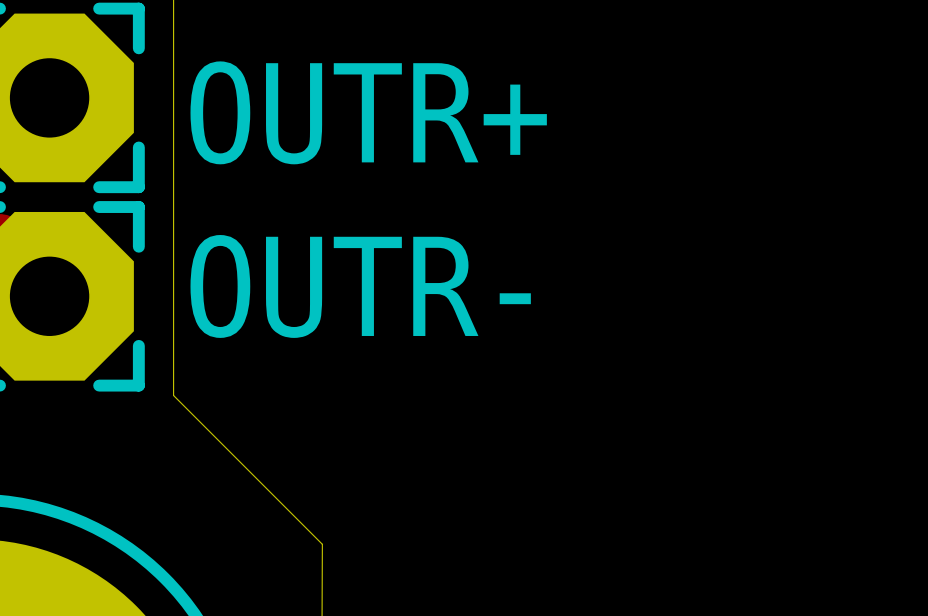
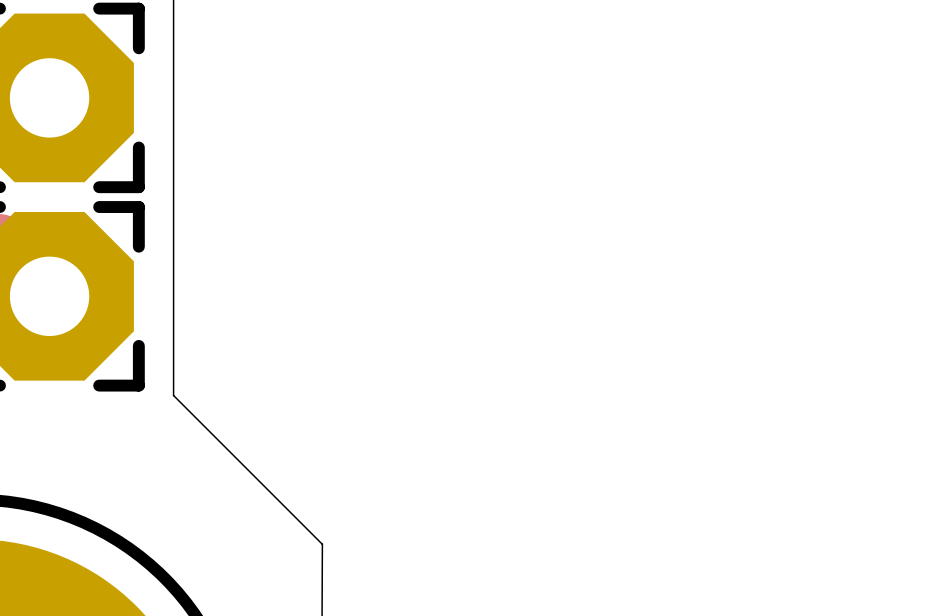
OUTR+ name: OUTR+ (368, 112) -> none
OUTR- name: OUTR- (360, 286) -> none

